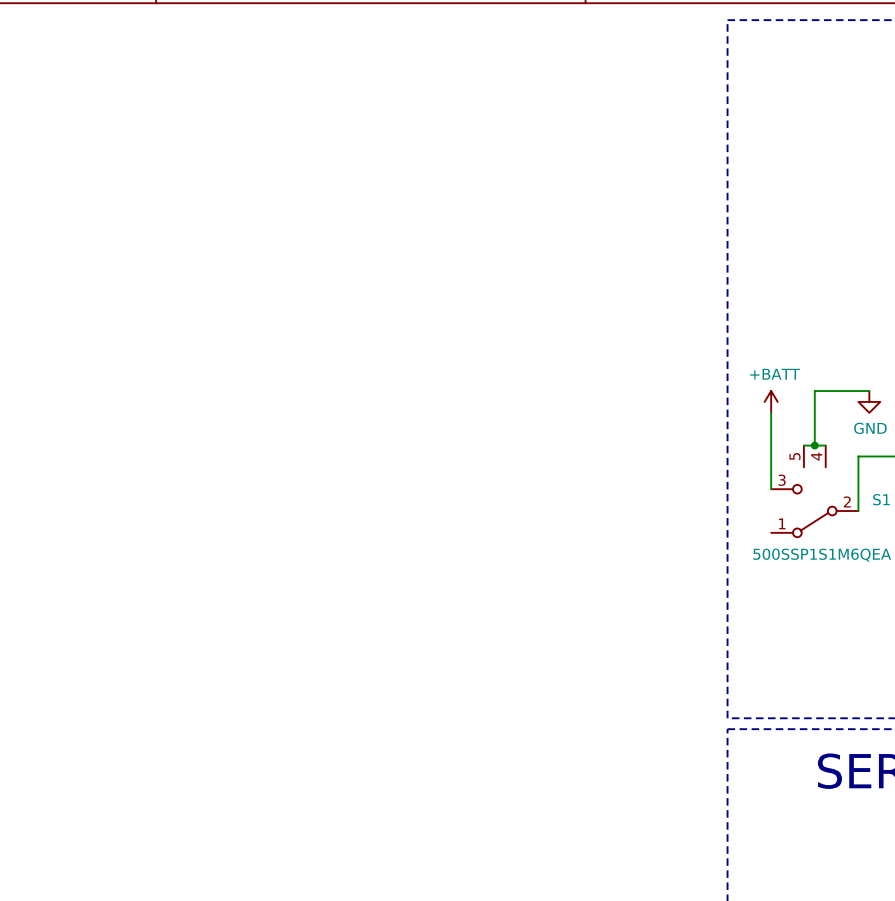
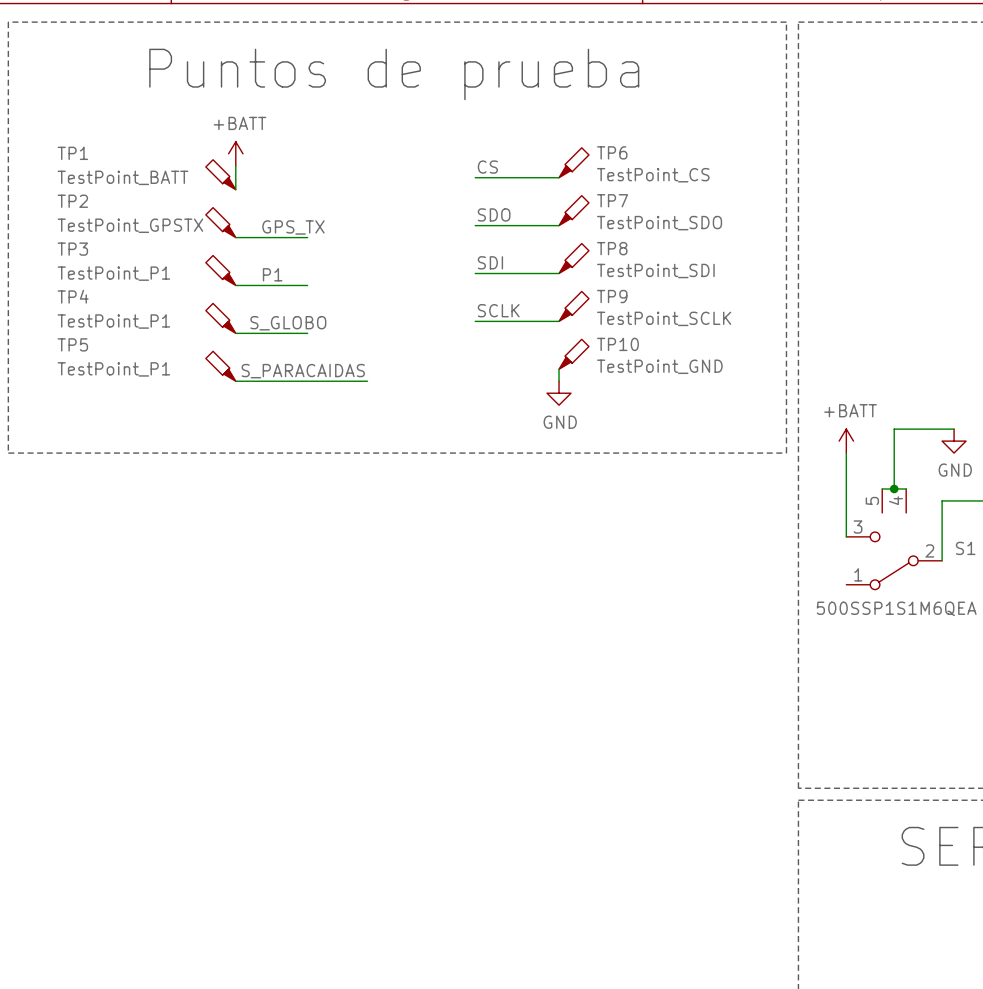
line: none -> (8, 22) (786, 22) (786, 453) (8, 453) (8, 22)
text: none -> Puntos de prueba (394, 74)
power symbol: none -> +BATT (235, 153)
TP6: none -> TestPoint_CS (573, 162)
wire: none -> (235, 165) (235, 189)
label: none -> CS (487, 167)
TP1: none -> TestPoint_BATT (220, 174)
wire: none -> (475, 177) (559, 177)
TP7: none -> TestPoint_SDO (573, 210)
label: none -> SDO (494, 214)
TP2: none -> TestPoint_GPSTX (220, 222)
wire: none -> (475, 225) (559, 225)
label: none -> GPS_TX (293, 227)
wire: none -> (235, 237) (307, 237)
TP8: none -> TestPoint_SDI (573, 258)
label: none -> SDI (490, 262)
TP3: none -> TestPoint_P1 (220, 270)
wire: none -> (475, 273) (559, 273)
label: none -> P1 (272, 274)
wire: none -> (235, 285) (307, 285)
TP9: none -> TestPoint_SCLK (573, 306)
label: none -> SCLK (498, 310)
TP4: none -> TestPoint_P1 (220, 318)
wire: none -> (475, 321) (559, 321)
label: none -> S_GLOBO (288, 323)
wire: none -> (235, 333) (307, 333)
TP10: none -> TestPoint_GND (573, 354)
TP5: none -> TestPoint_P1 (220, 366)
wire: none -> (559, 369) (559, 381)
label: none -> S_PARACAIDAS (303, 371)
wire: none -> (235, 381) (367, 381)
power symbol: none -> GND (559, 393)

